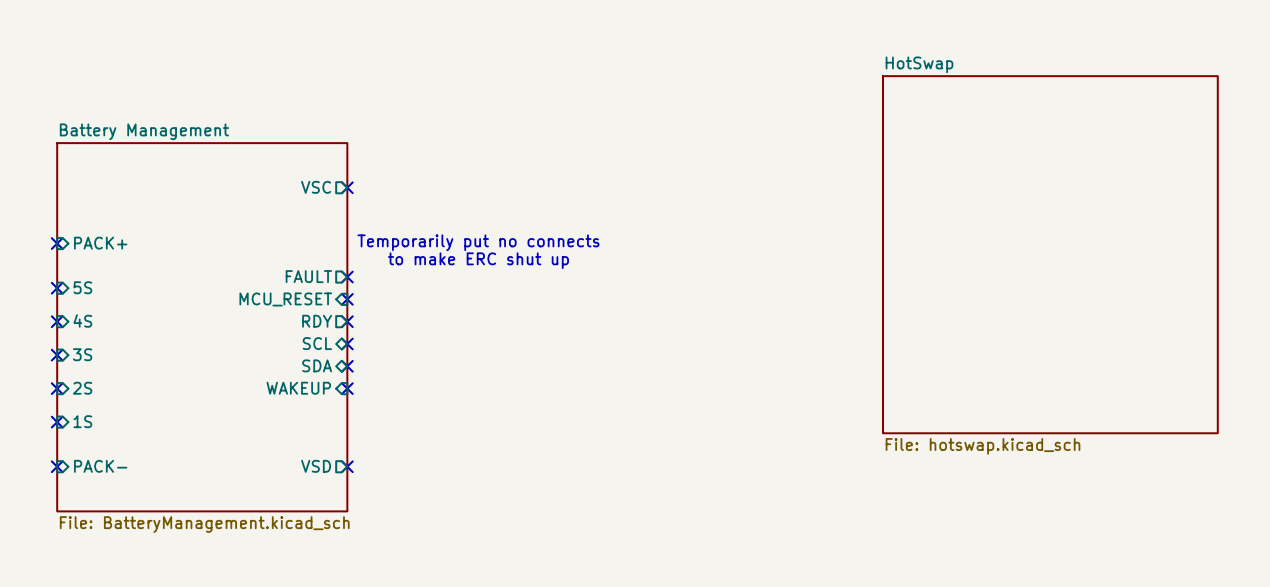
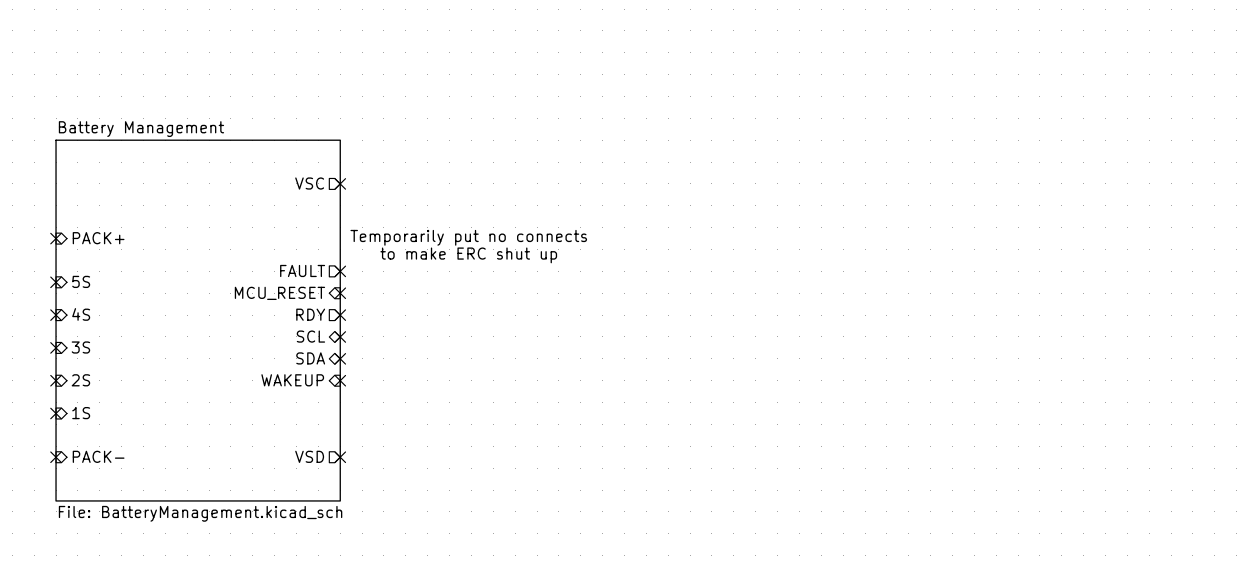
sheet HotSwap: File: hotswap.kicad_sch (1050, 254) -> none

